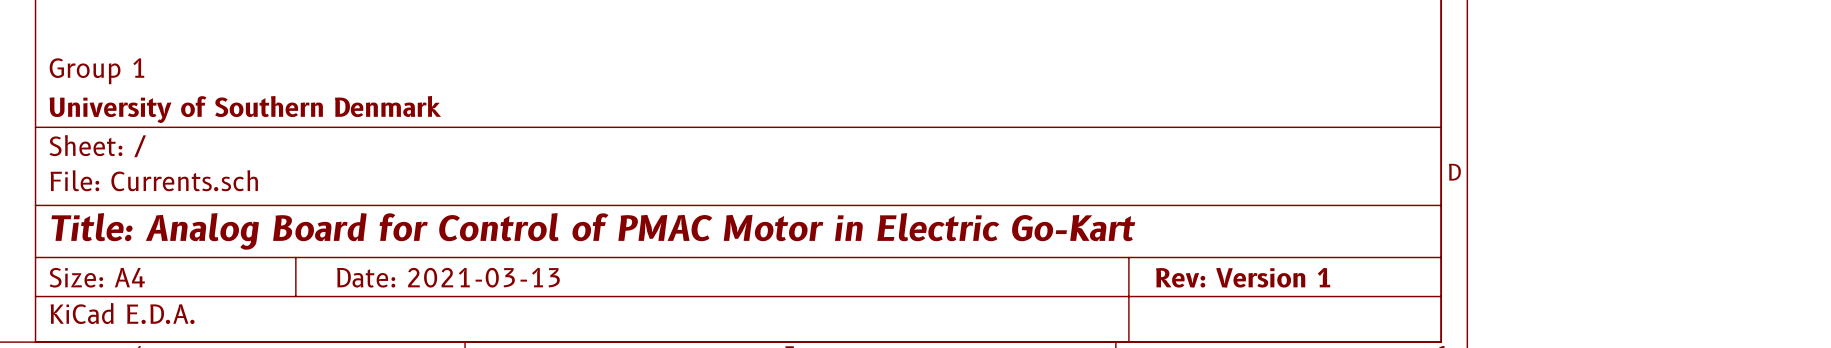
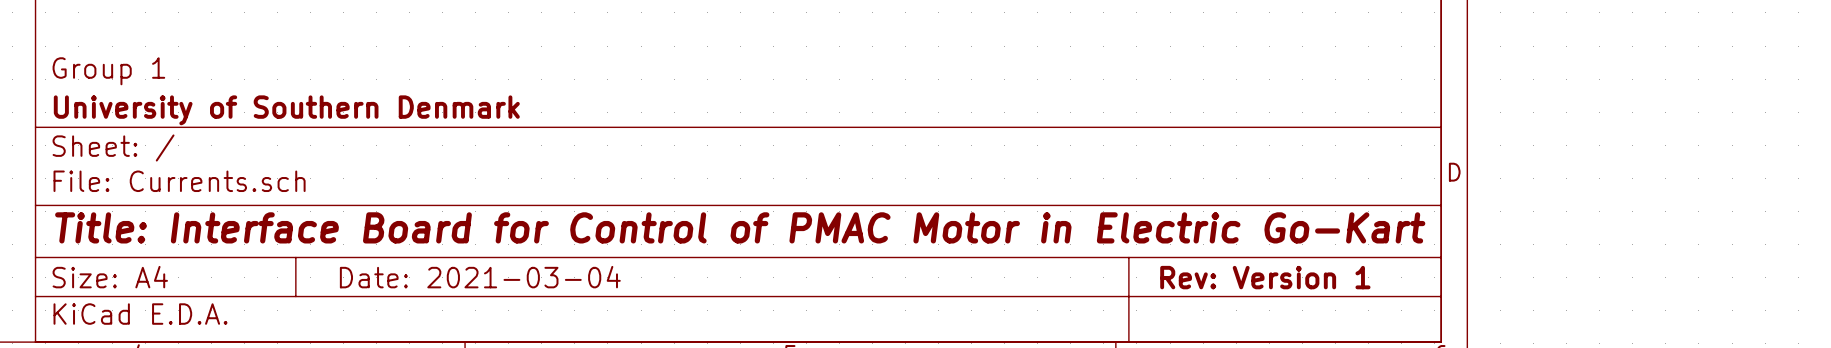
title block: Title: Analog Board for Control of PMAC Motor in Electric Go-Kart (593, 231) -> Title: Interface Board for Control of PMAC Motor in Electric Go-Kart (740, 227)
title block: Date: 2021-03-13 (448, 277) -> Date: 2021-03-04 (480, 277)

